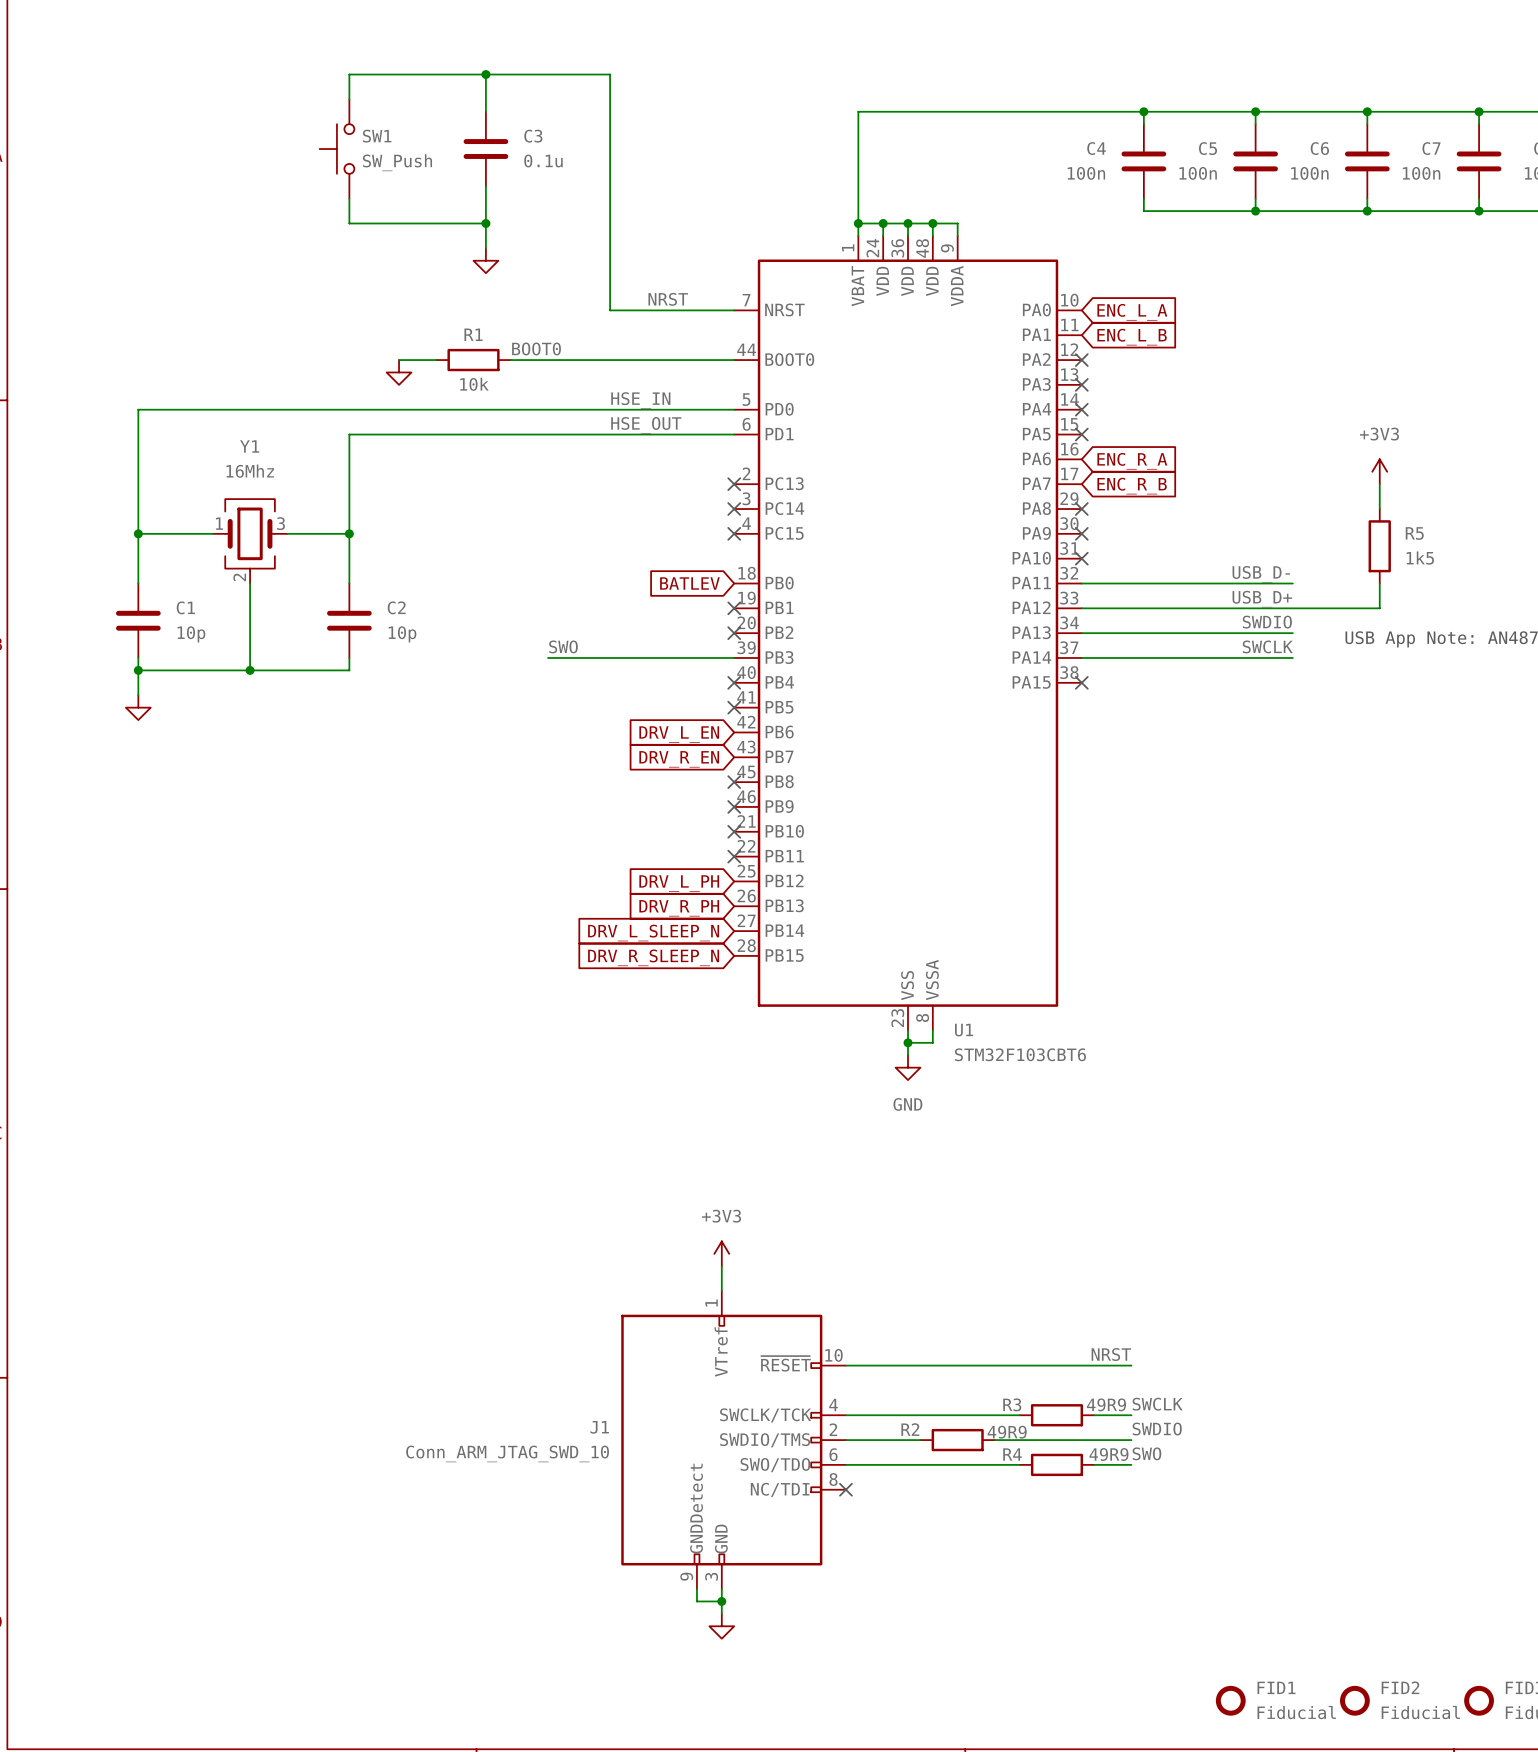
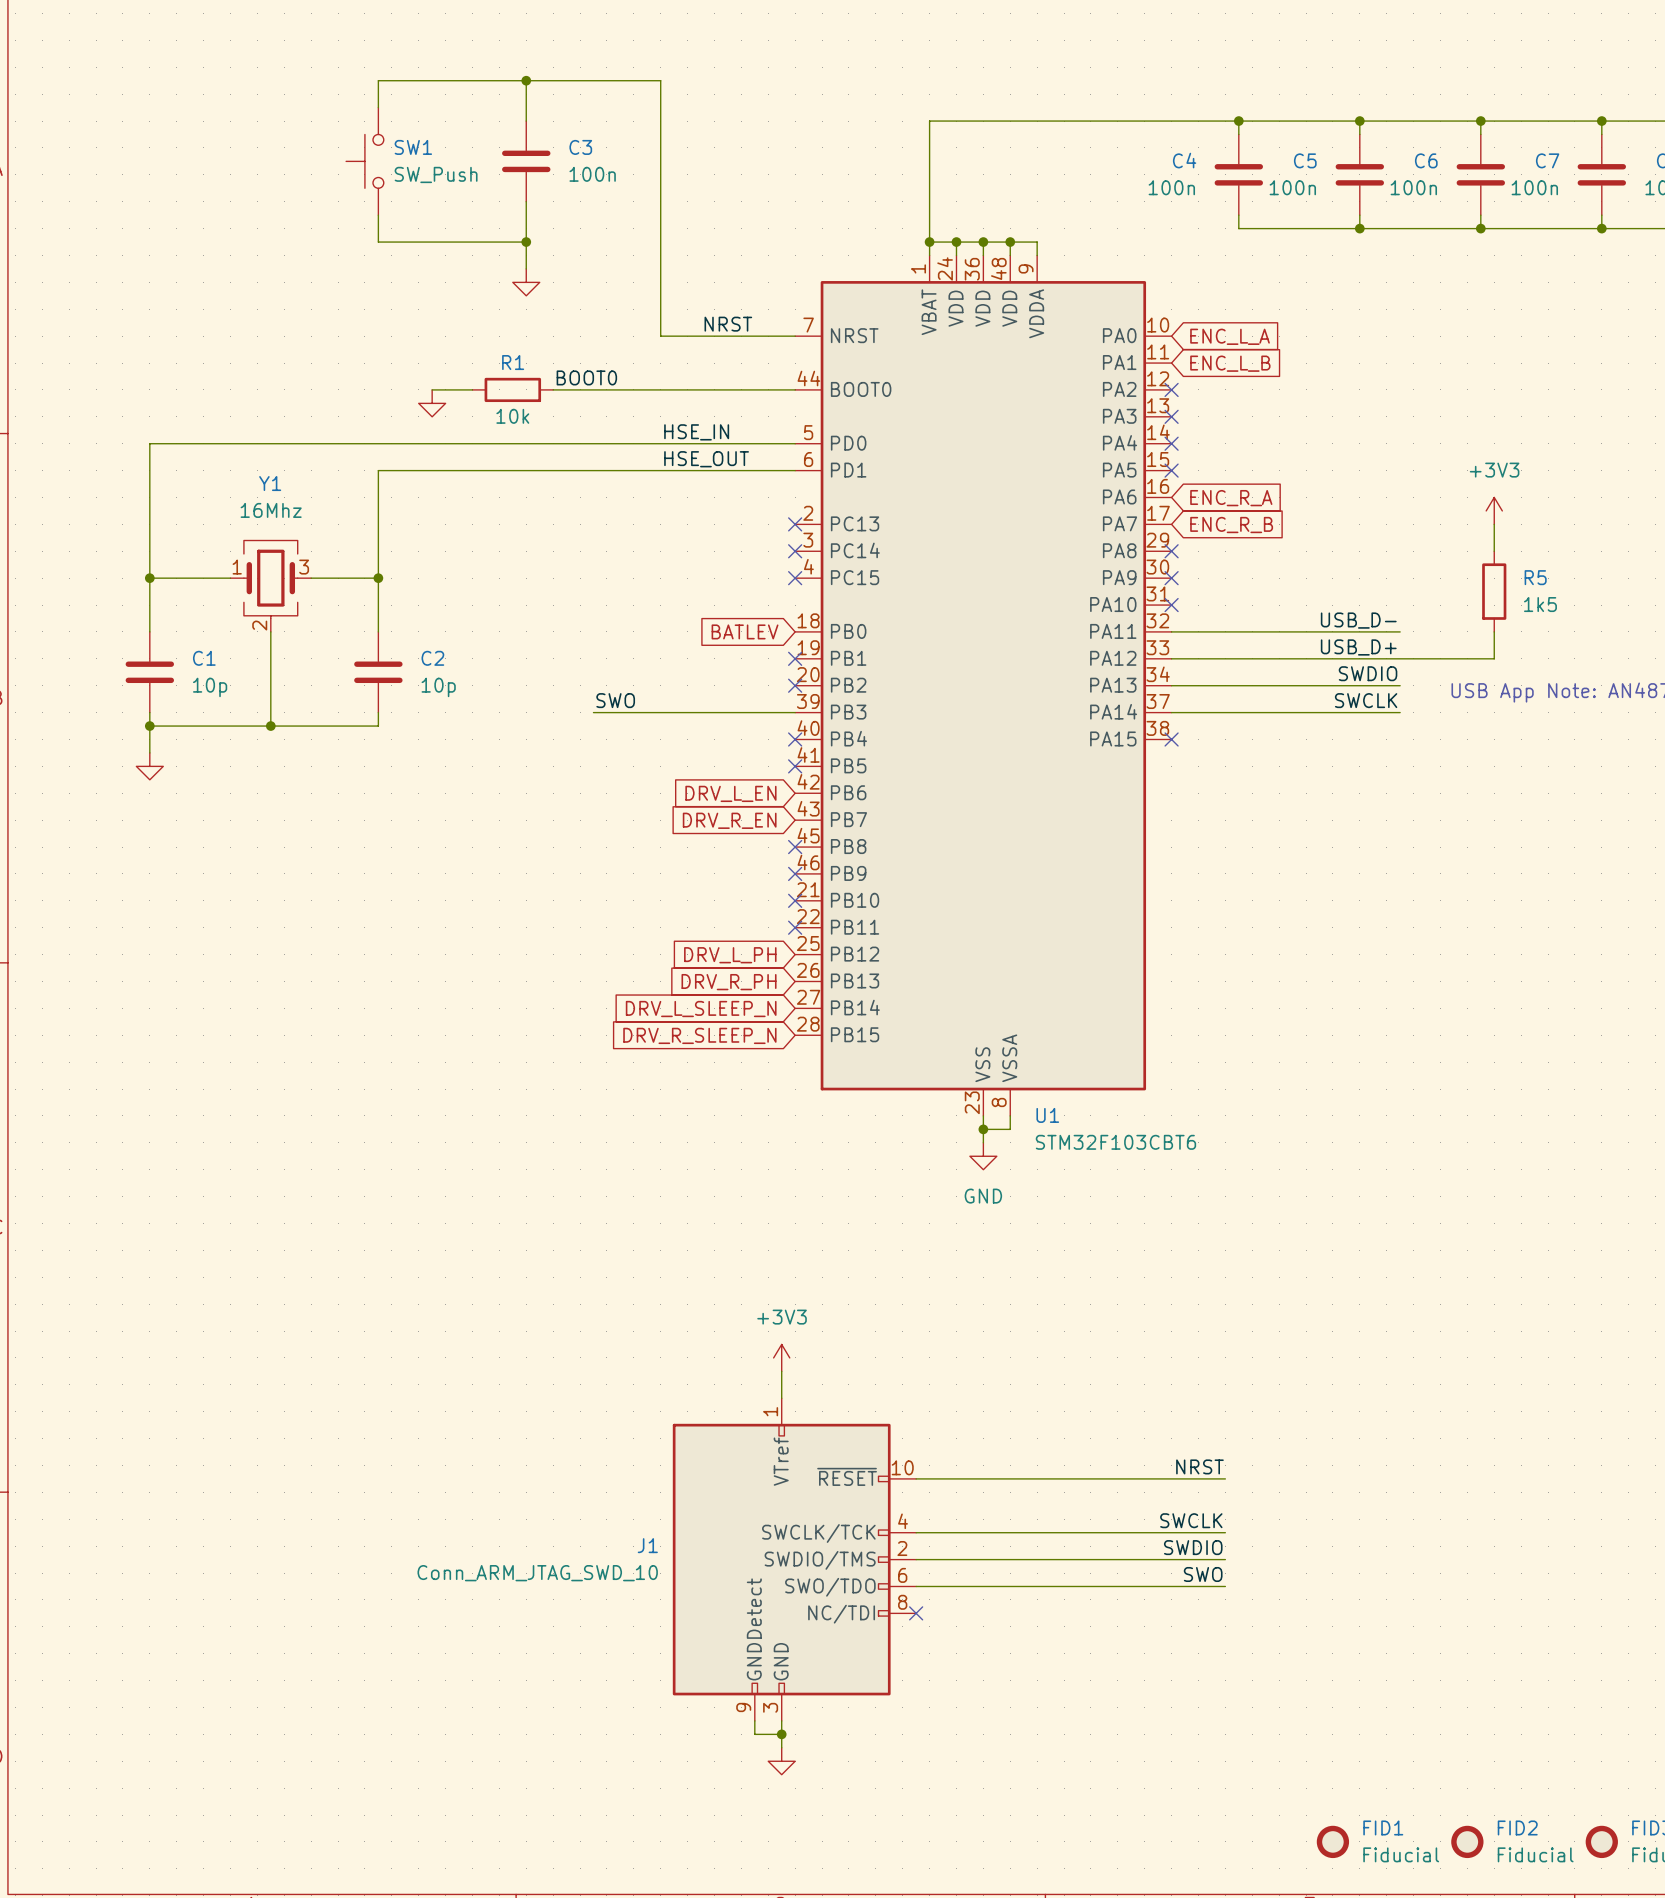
C3 value: 0.1u (543, 160) -> 100n (592, 174)
label position: SWCLK (1157, 1404) -> SWCLK (1191, 1520)
wire: none -> (1104, 1532) (1185, 1532)
R3: 49R9 (1056, 1415) -> none
label position: SWDIO (1157, 1429) -> SWDIO (1193, 1547)
wire: none -> (996, 1559) (1077, 1559)
R2: 49R9 (957, 1440) -> none
label position: SWO (1146, 1453) -> SWO (1203, 1574)
wire: none -> (1104, 1586) (1185, 1586)
R4: 49R9 (1056, 1464) -> none

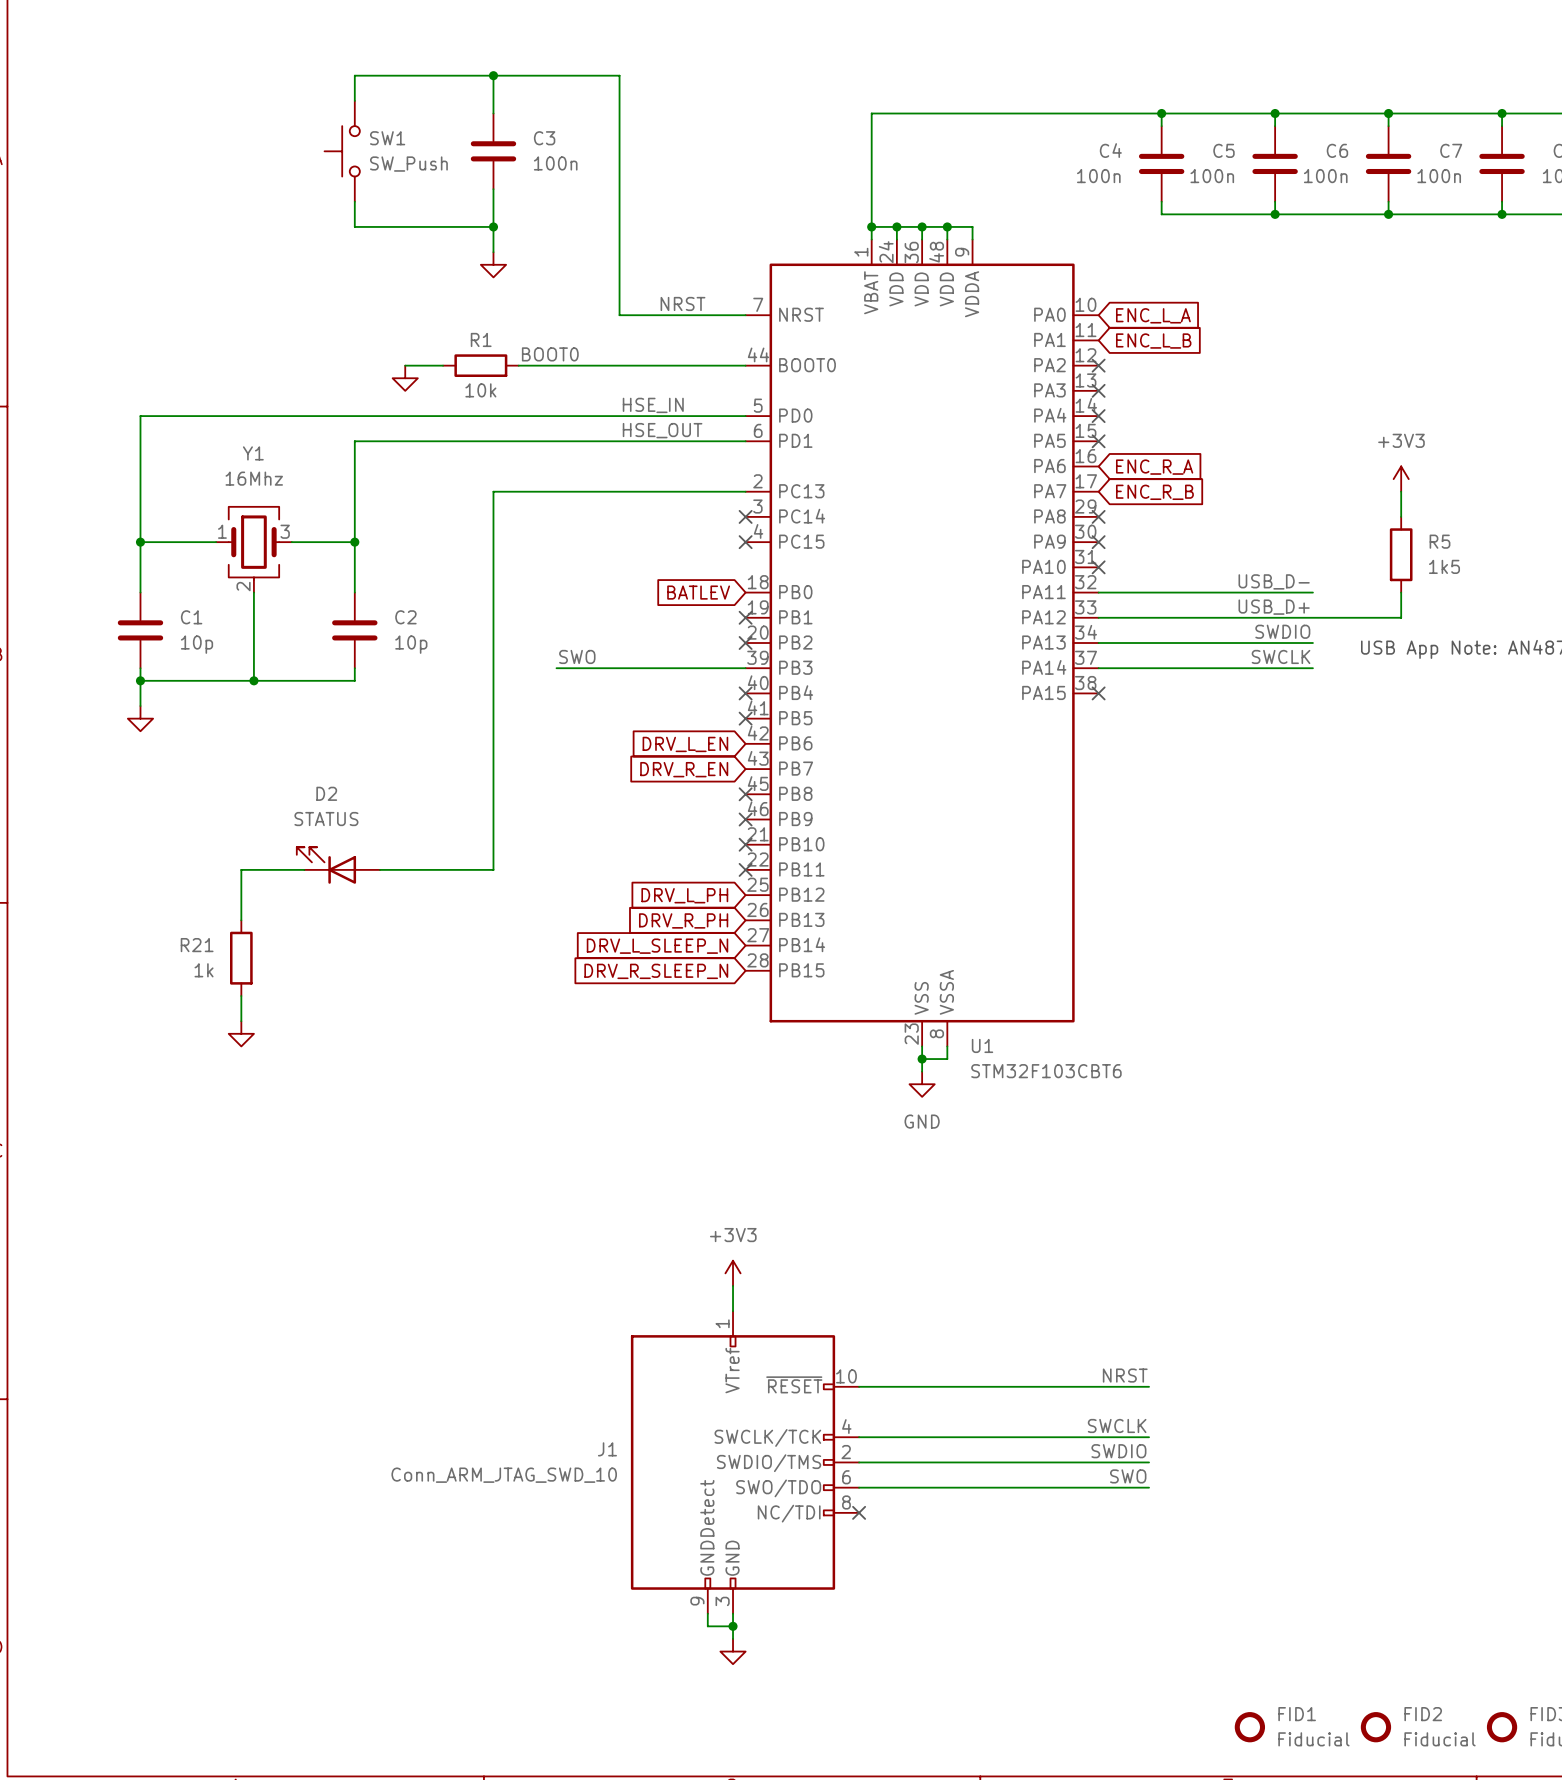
wire: none -> (745, 491) (493, 491) (493, 869) (380, 869)
no-connect mark: (795, 524) -> none
D2: none -> STATUS (338, 865)
wire: none -> (304, 869) (241, 869) (241, 920)
R21: none -> 1k (241, 958)
wire: none -> (241, 995) (241, 1021)
power symbol: none -> (241, 1033)

